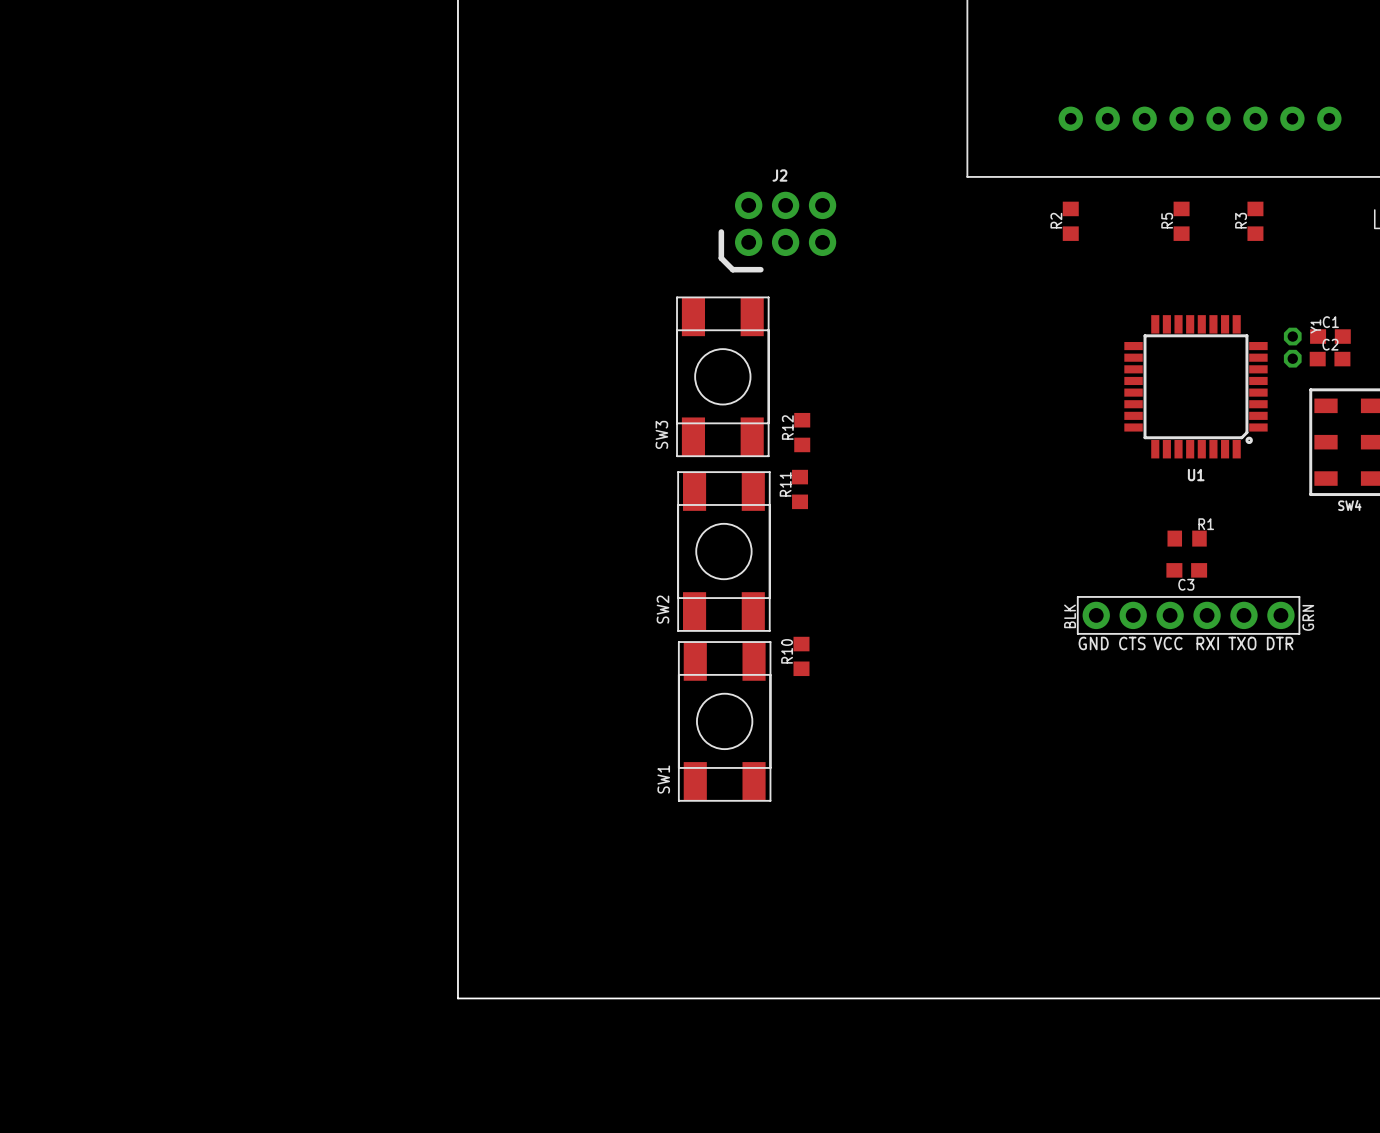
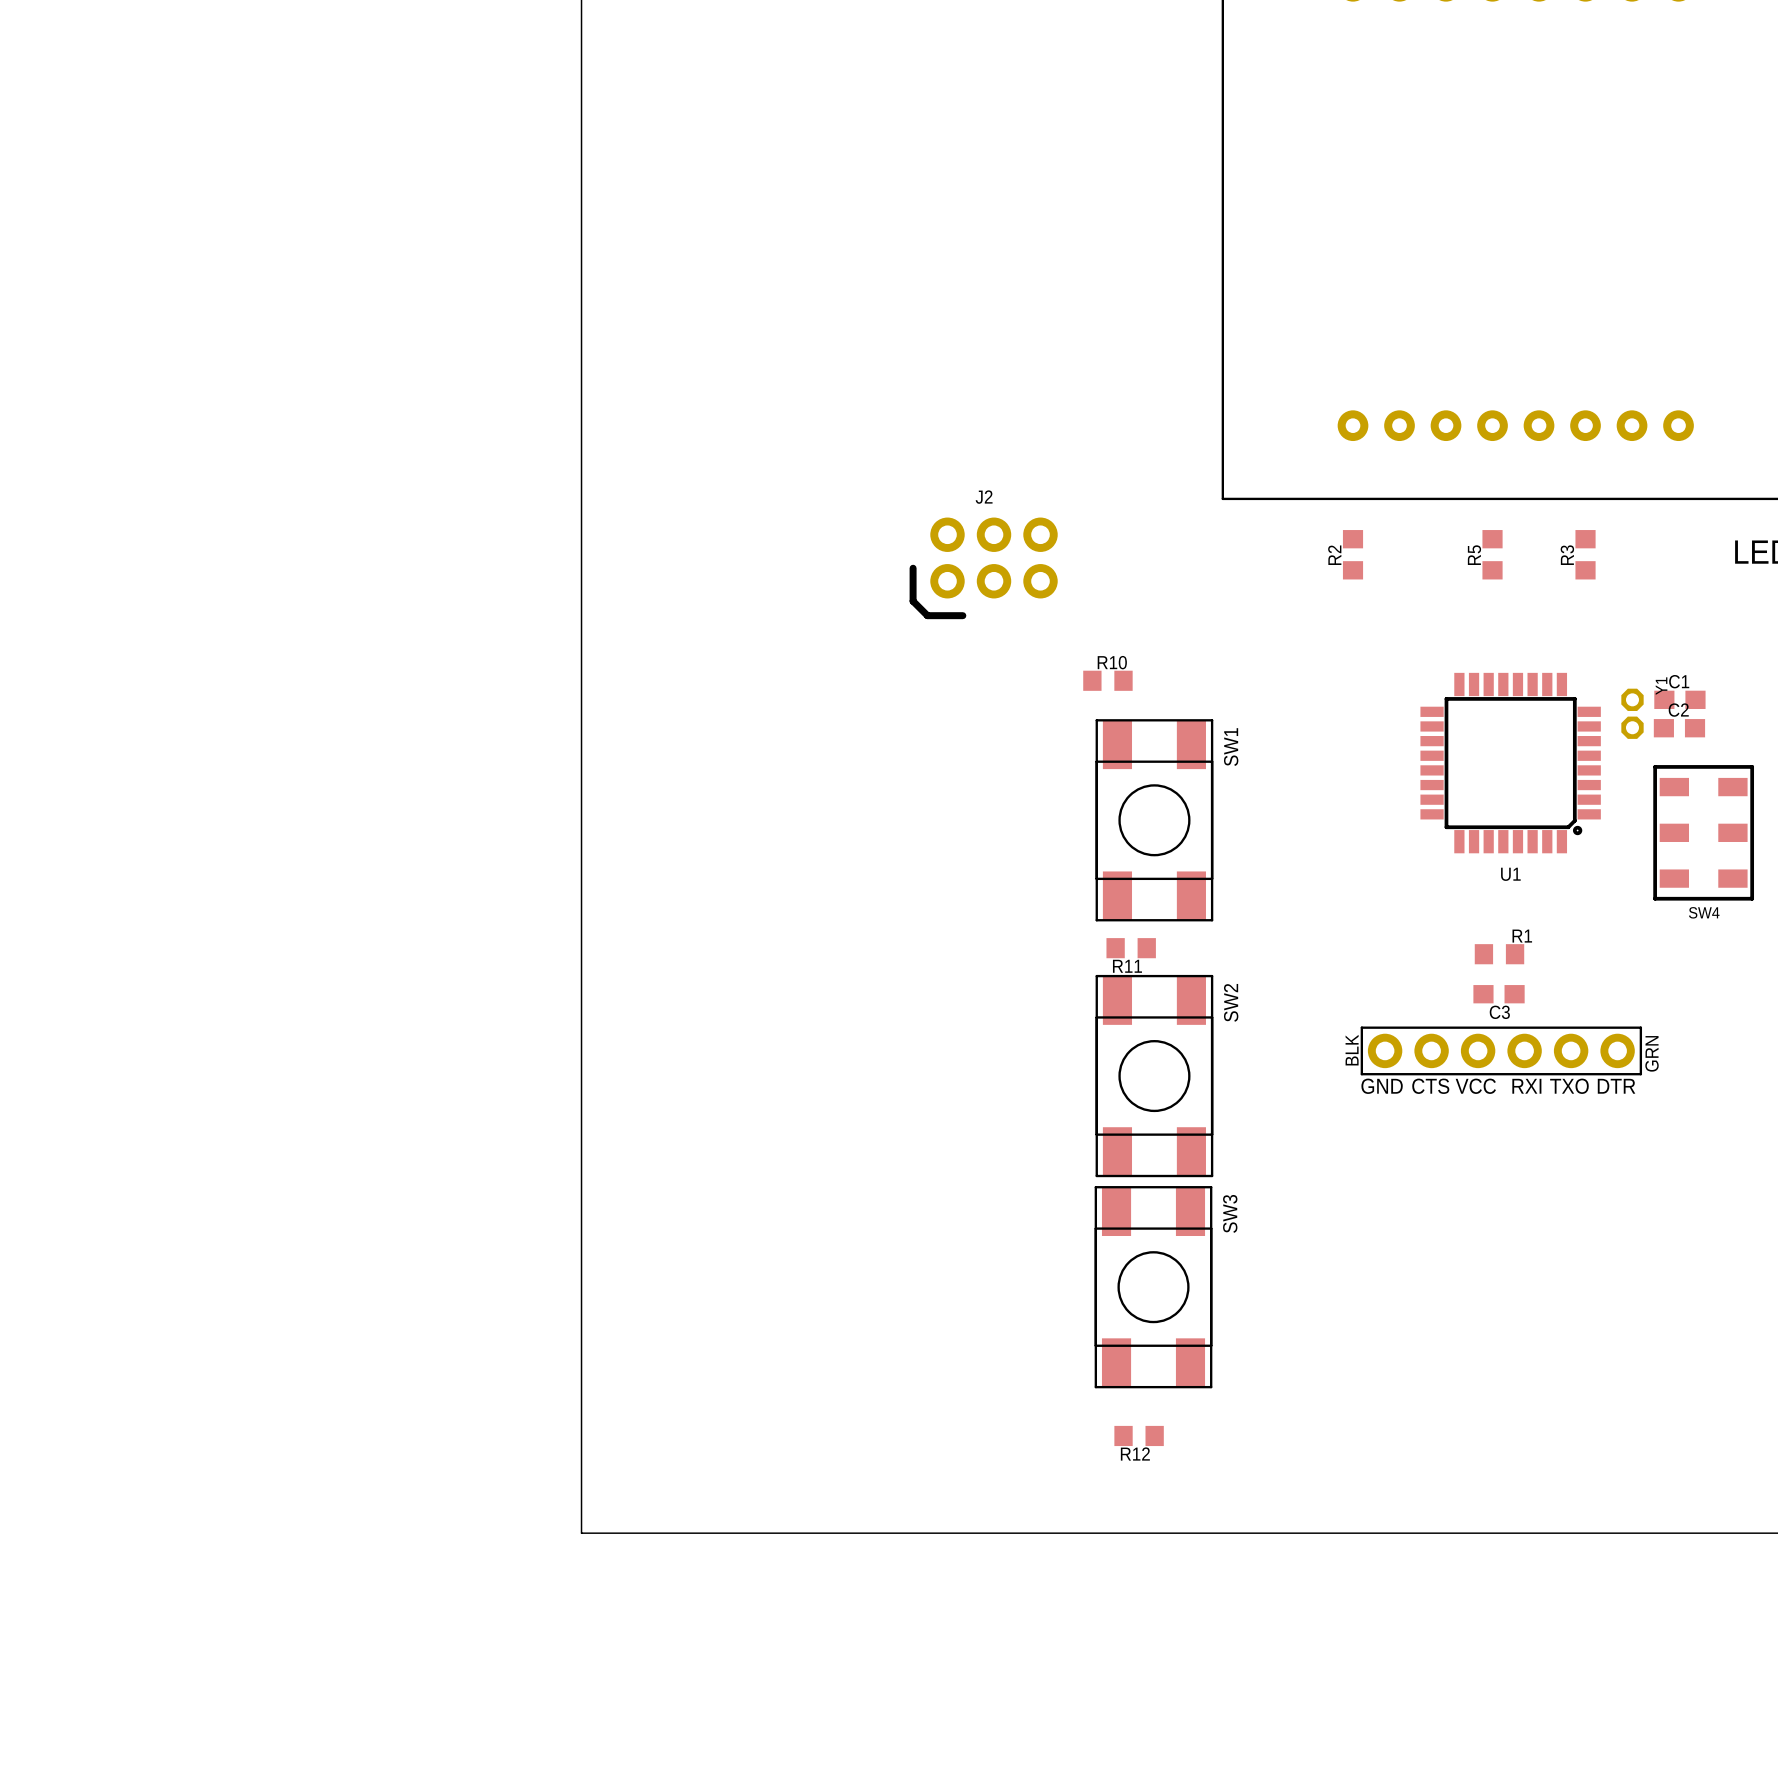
SW3 position: (722, 376) -> (1153, 1287)
R12 rotation: 0° (802, 432) -> 90° clockwise (1139, 1435)
R12 position: (802, 432) -> (1139, 1435)
SW3 name position: SW3 (661, 434) -> SW3 (1230, 1213)
R11 rotation: 0° (800, 489) -> 90° clockwise (1131, 948)
R11 position: (800, 489) -> (1131, 948)
SW2 position: (723, 551) -> (1154, 1076)
SW2 name position: SW2 (662, 609) -> SW2 (1231, 1002)
R10 rotation: 0° (801, 656) -> 90° clockwise (1107, 680)
R10 position: (801, 656) -> (1107, 680)
SW1 position: (724, 721) -> (1154, 820)
SW1 name position: SW1 (663, 779) -> SW1 (1231, 747)

